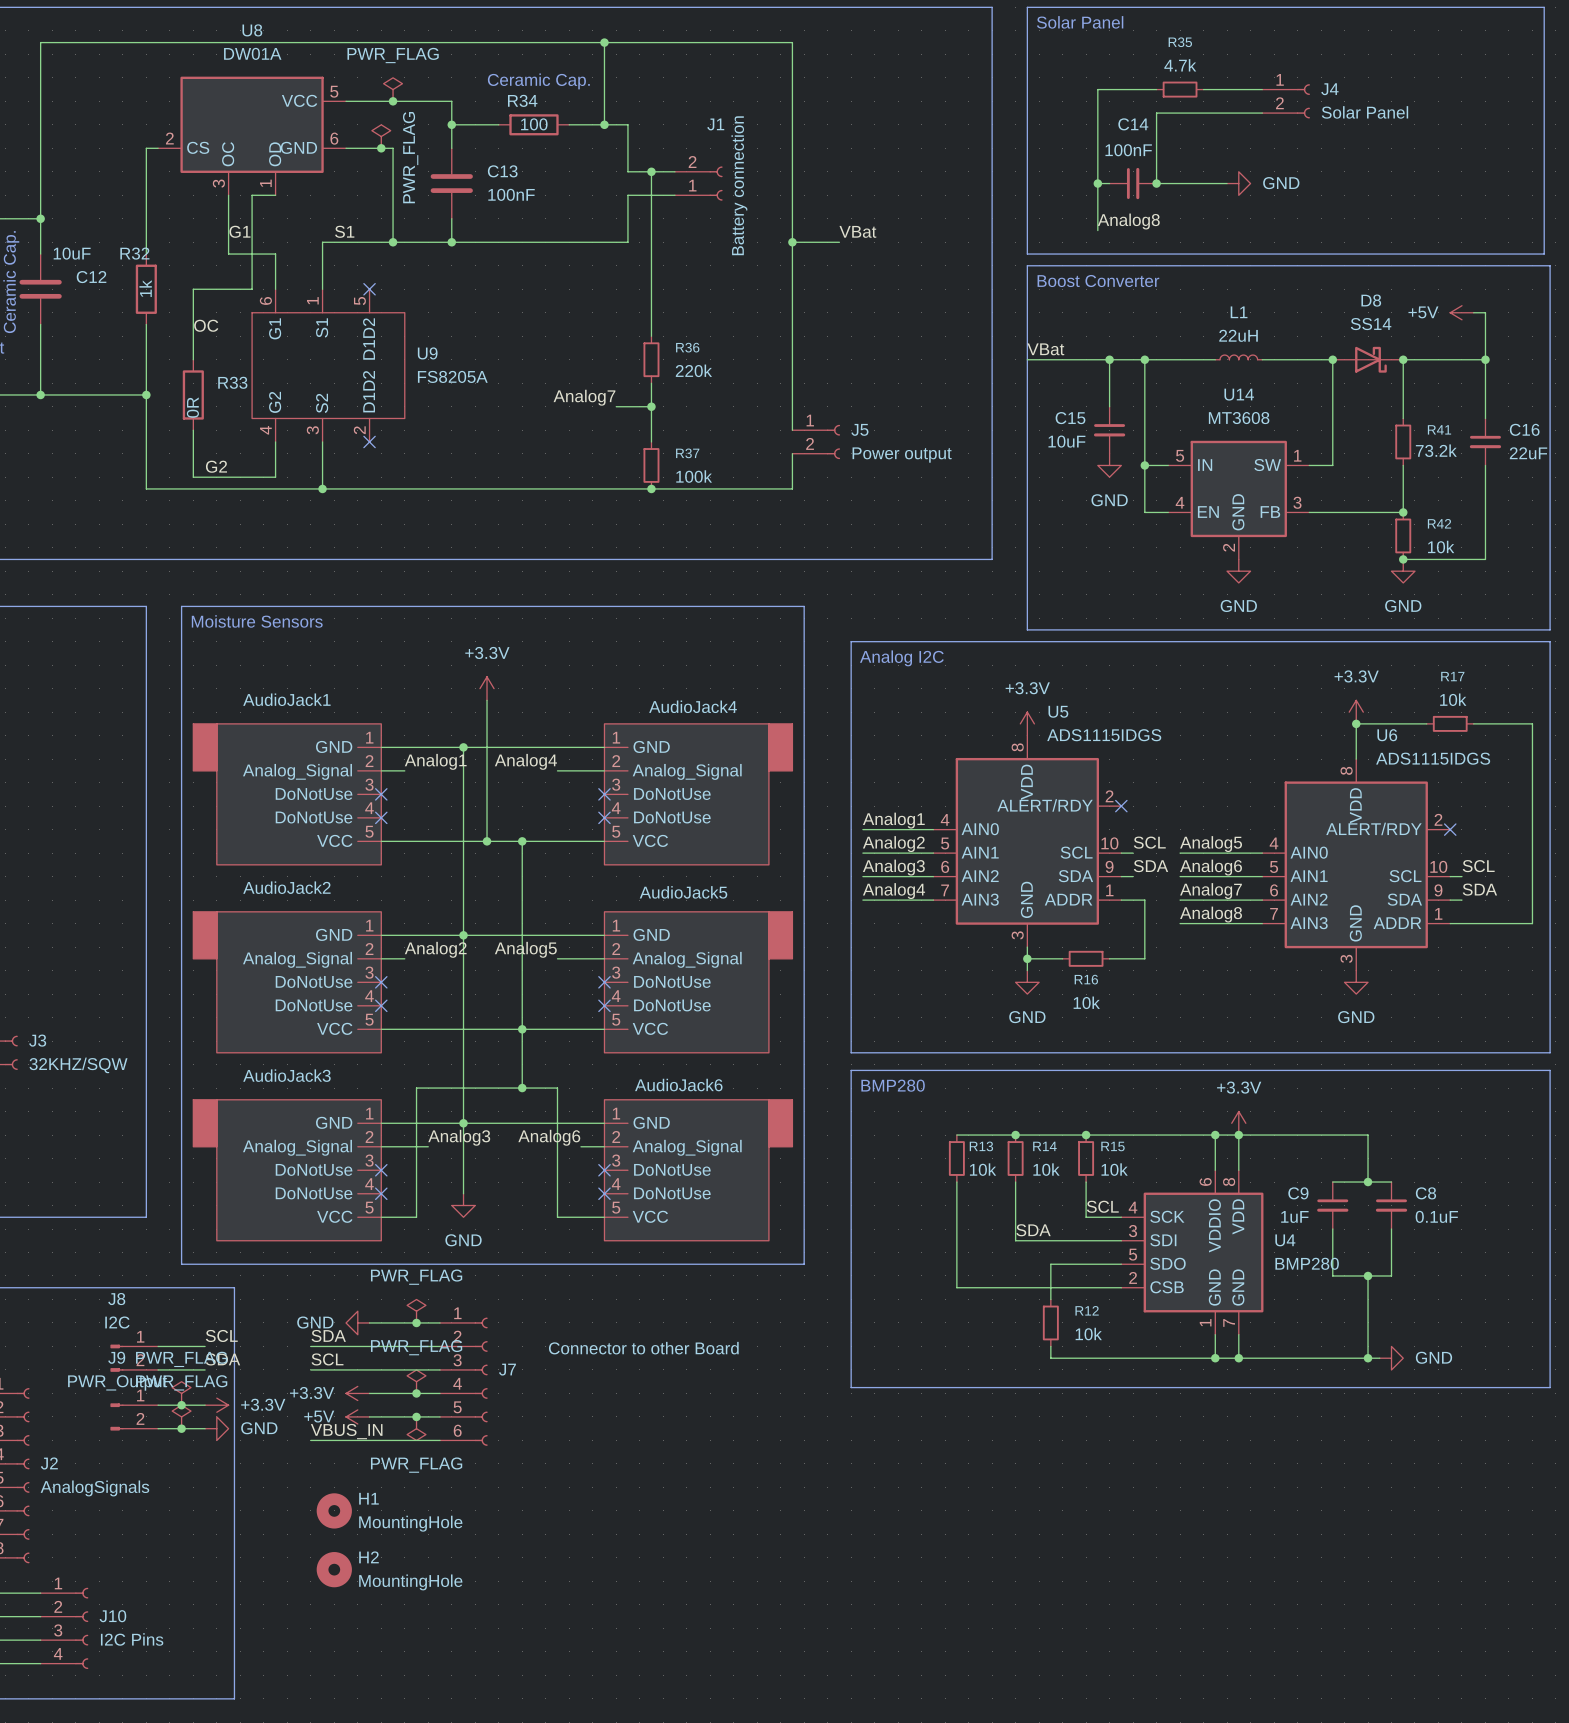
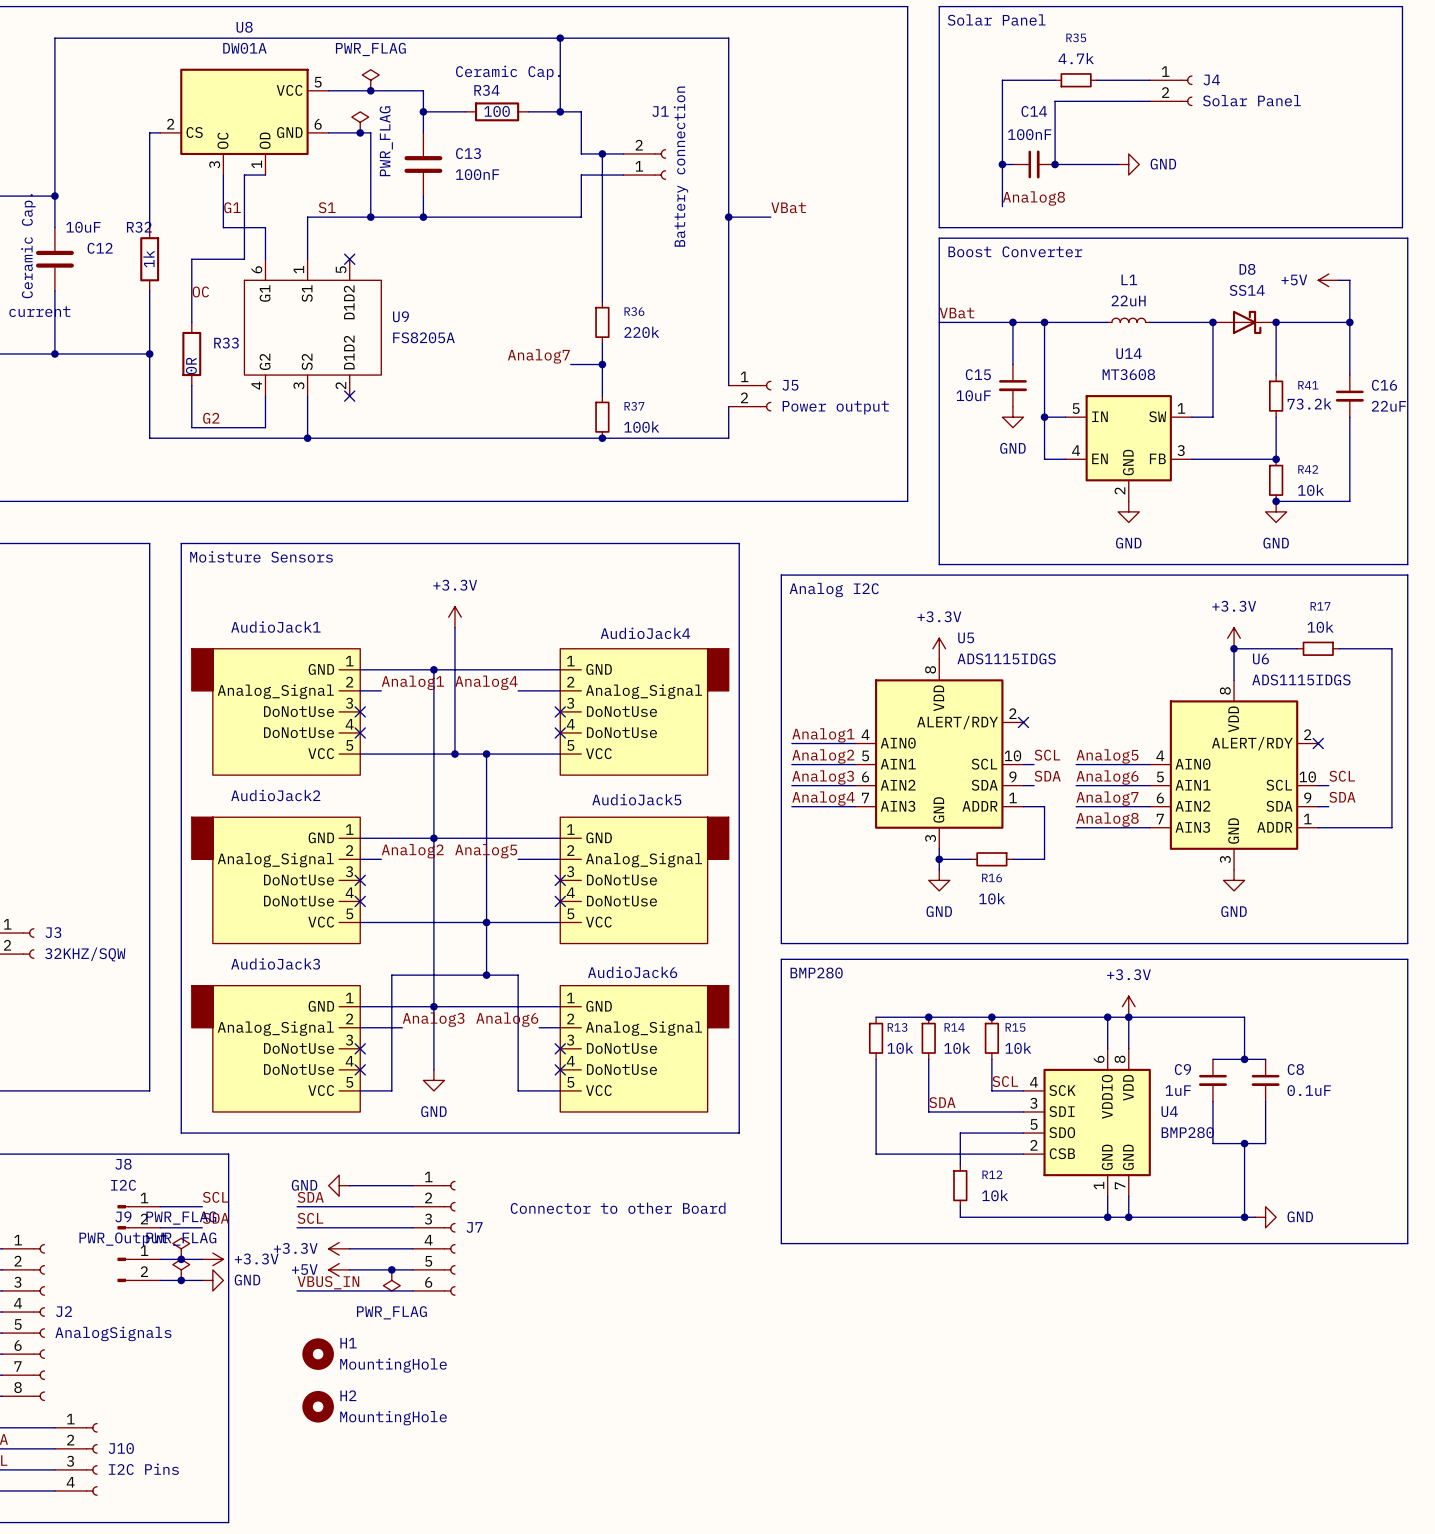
power symbol: PWR_FLAG (416, 1311) -> none
junction: (416, 1322) -> none
power symbol: PWR_FLAG (416, 1381) -> none
junction: (416, 1393) -> none

